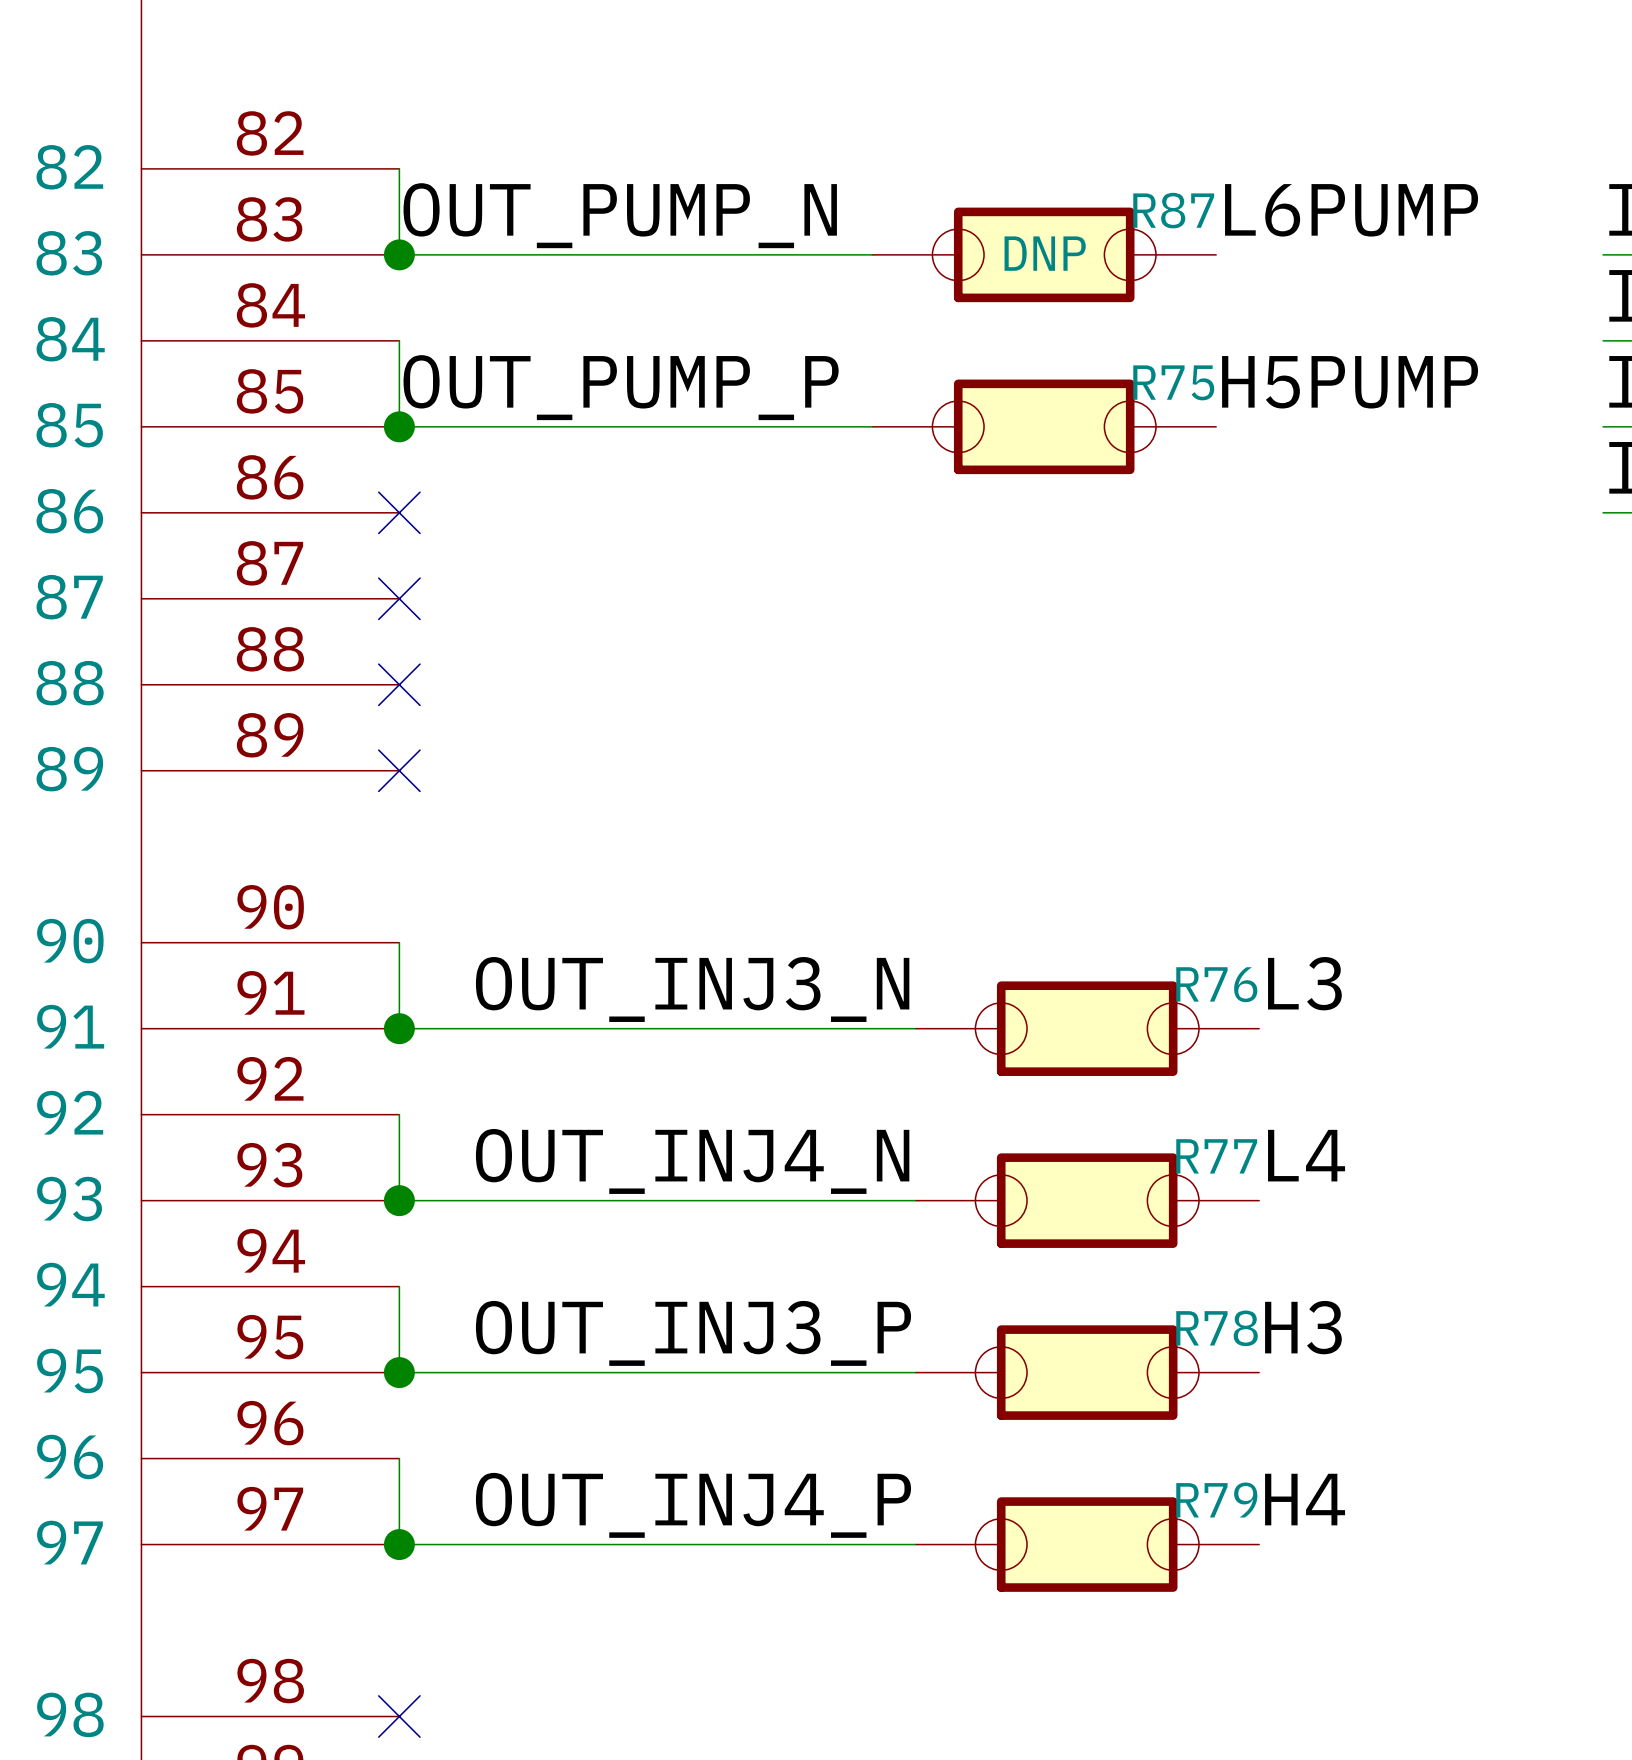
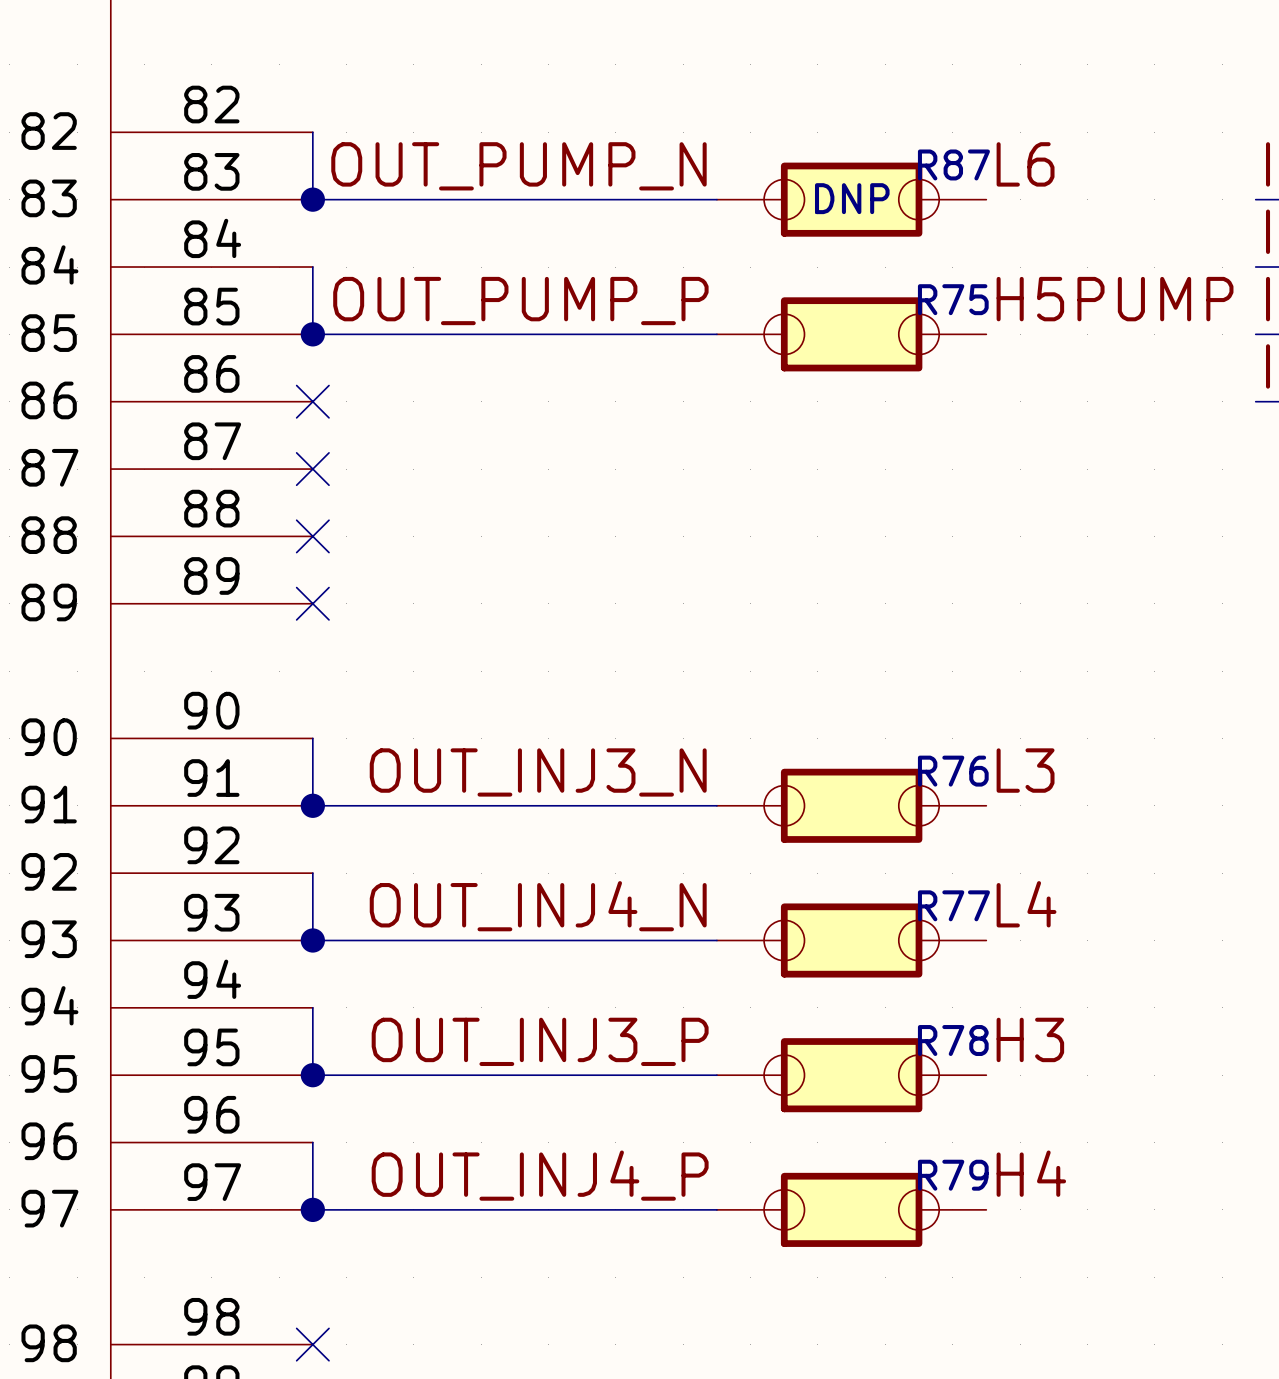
label: none -> L6 (1025, 164)
label: L6PUMP (1351, 210) -> none
label position: OUT_PUMP_N (620, 215) -> OUT_PUMP_N (518, 166)
R87 position: (1044, 254) -> (851, 199)
label position: H5PUMP (1350, 382) -> H5PUMP (1115, 299)
label position: OUT_PUMP_P (621, 387) -> OUT_PUMP_P (520, 301)
R75 position: (1044, 426) -> (851, 334)

